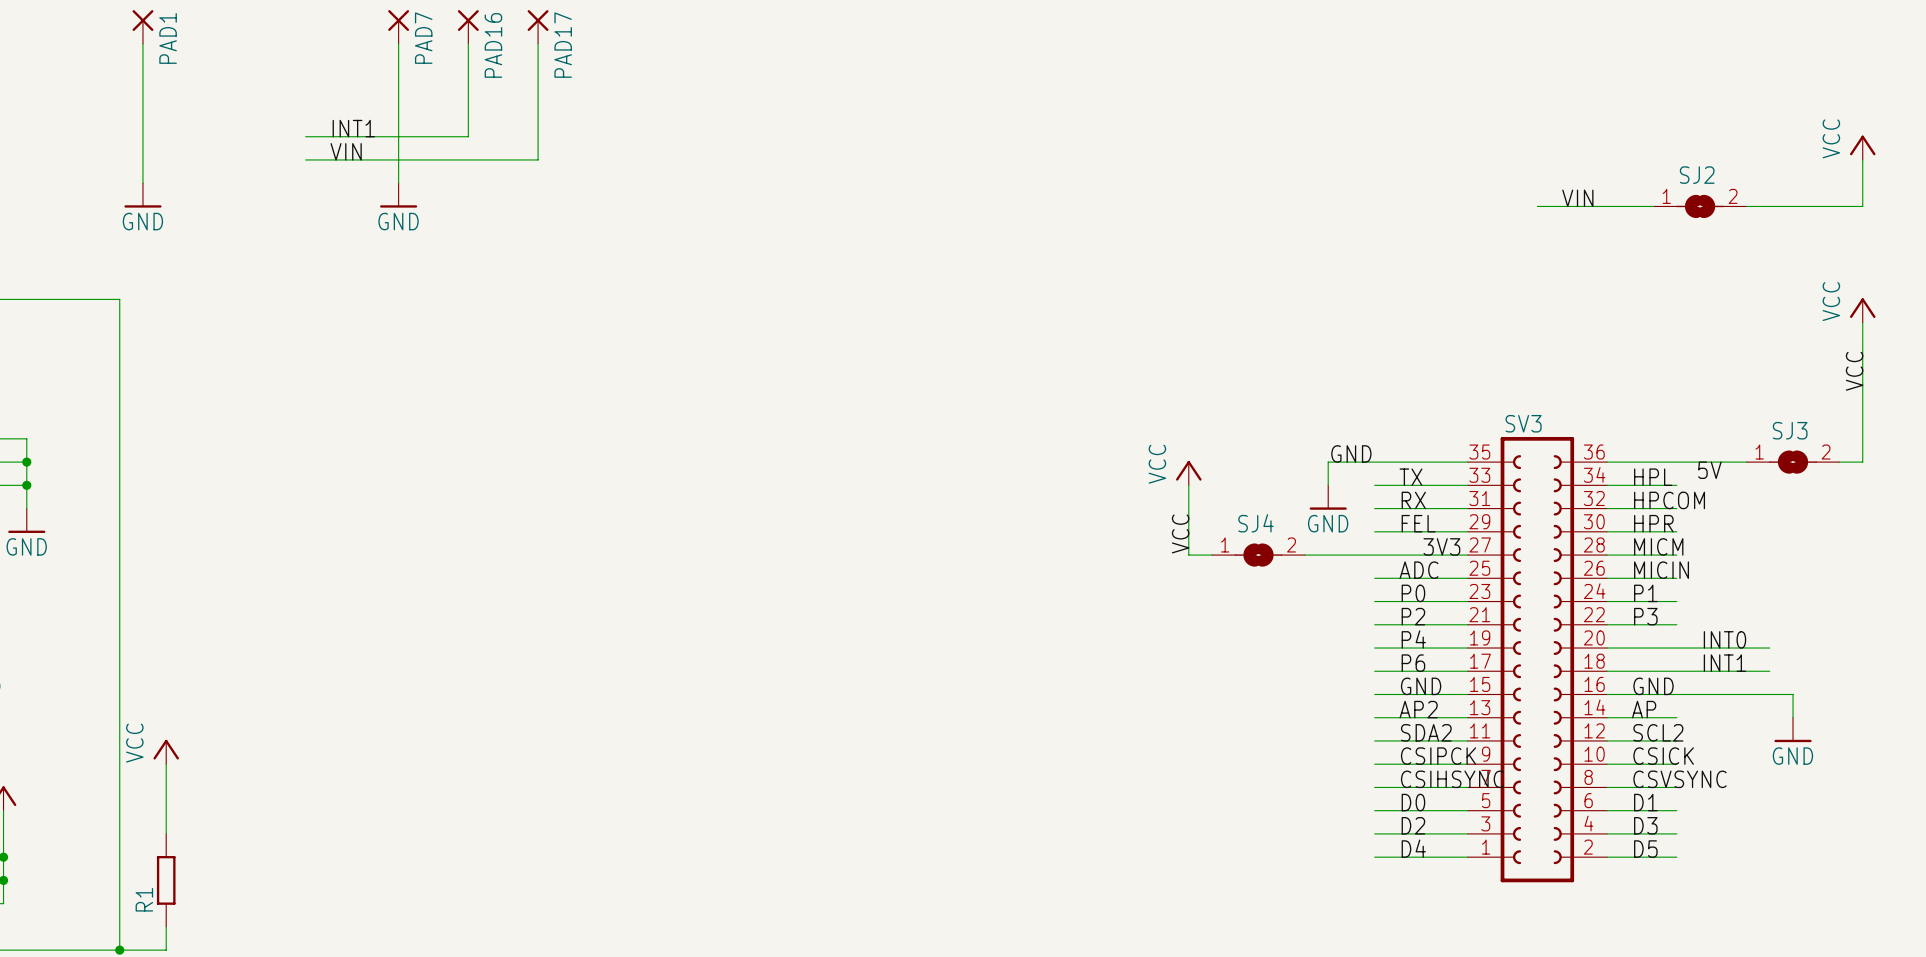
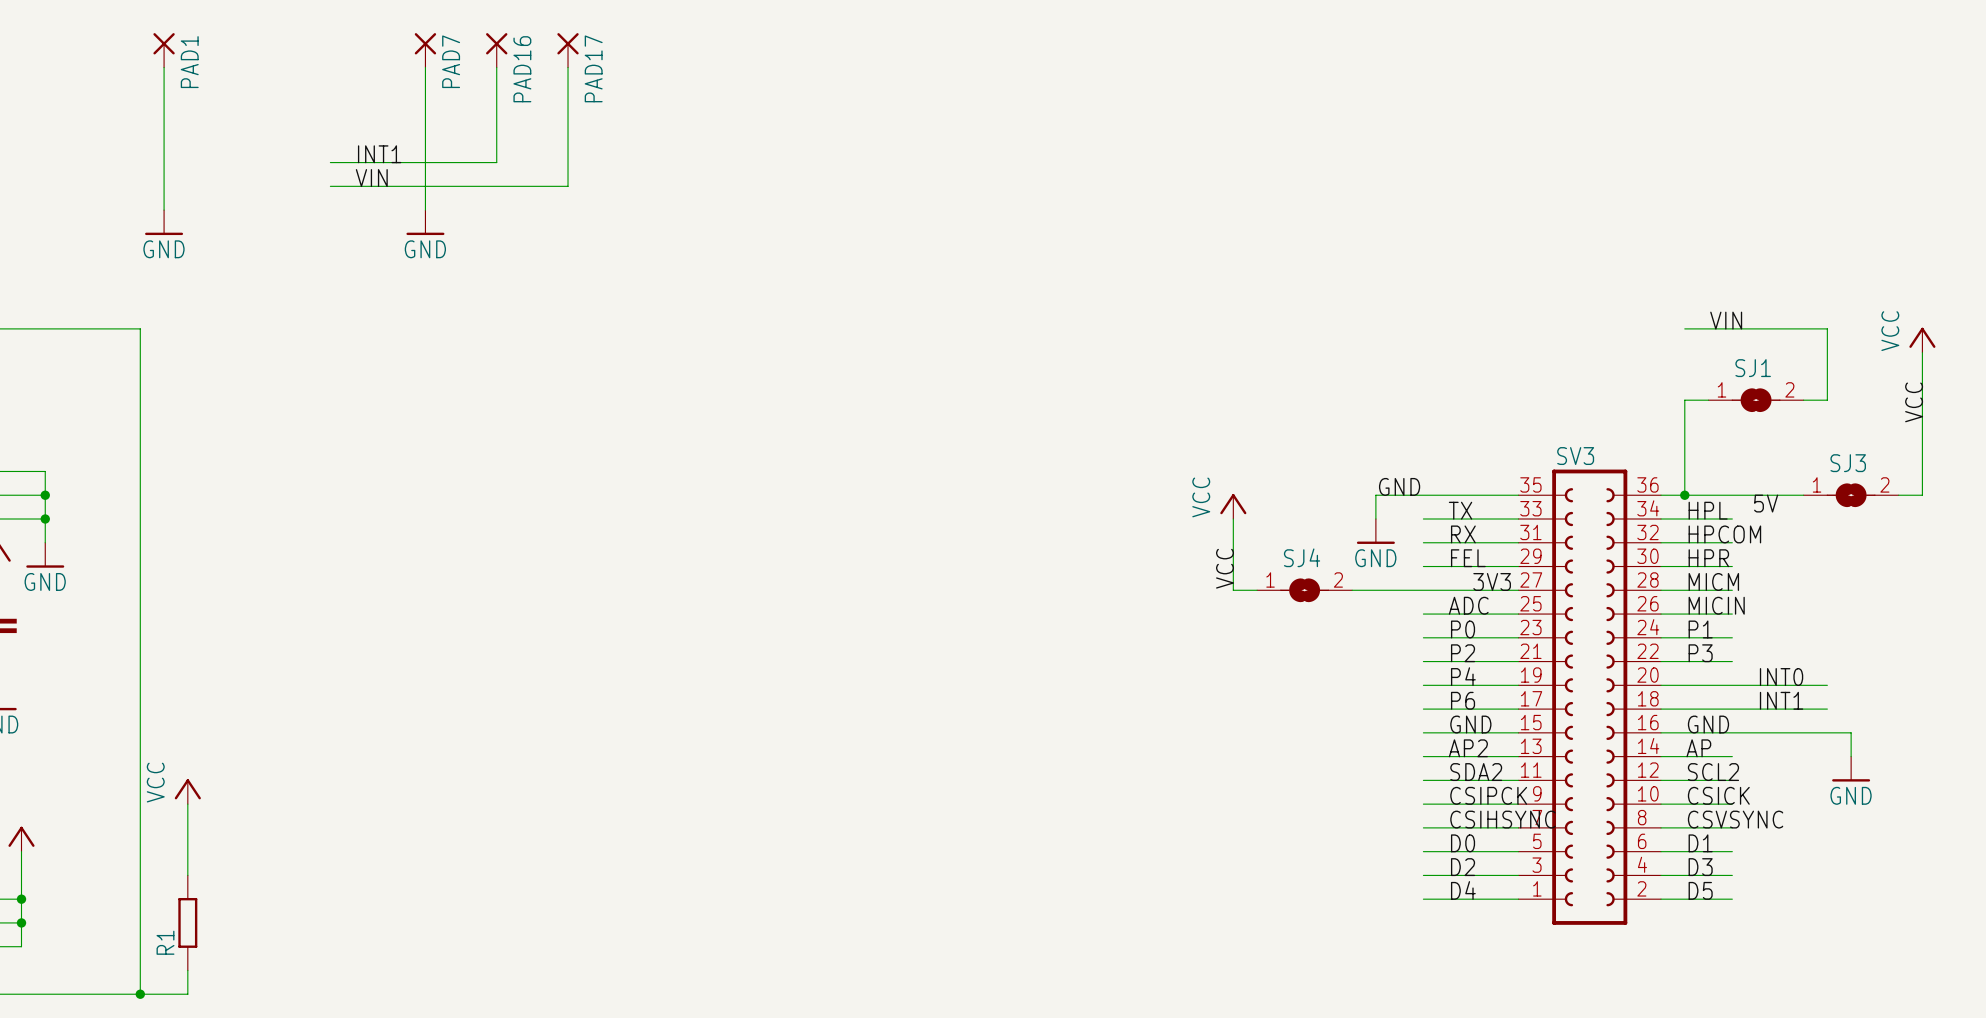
power symbol: VCC (1862, 147) -> none
wire: (1862, 159) (1862, 206) (1746, 206) -> none
label position: VIN (1577, 198) -> VIN (1726, 320)
wire: (1537, 206) (1653, 206) -> none
SJ2: (1700, 206) -> none
wire: none -> (1684, 328) (1827, 328) (1827, 400) (1803, 400)
wire: none -> (1708, 400) (1684, 400) (1684, 495)
SJ1: none -> (1756, 400)
junction: none -> (1684, 495)

